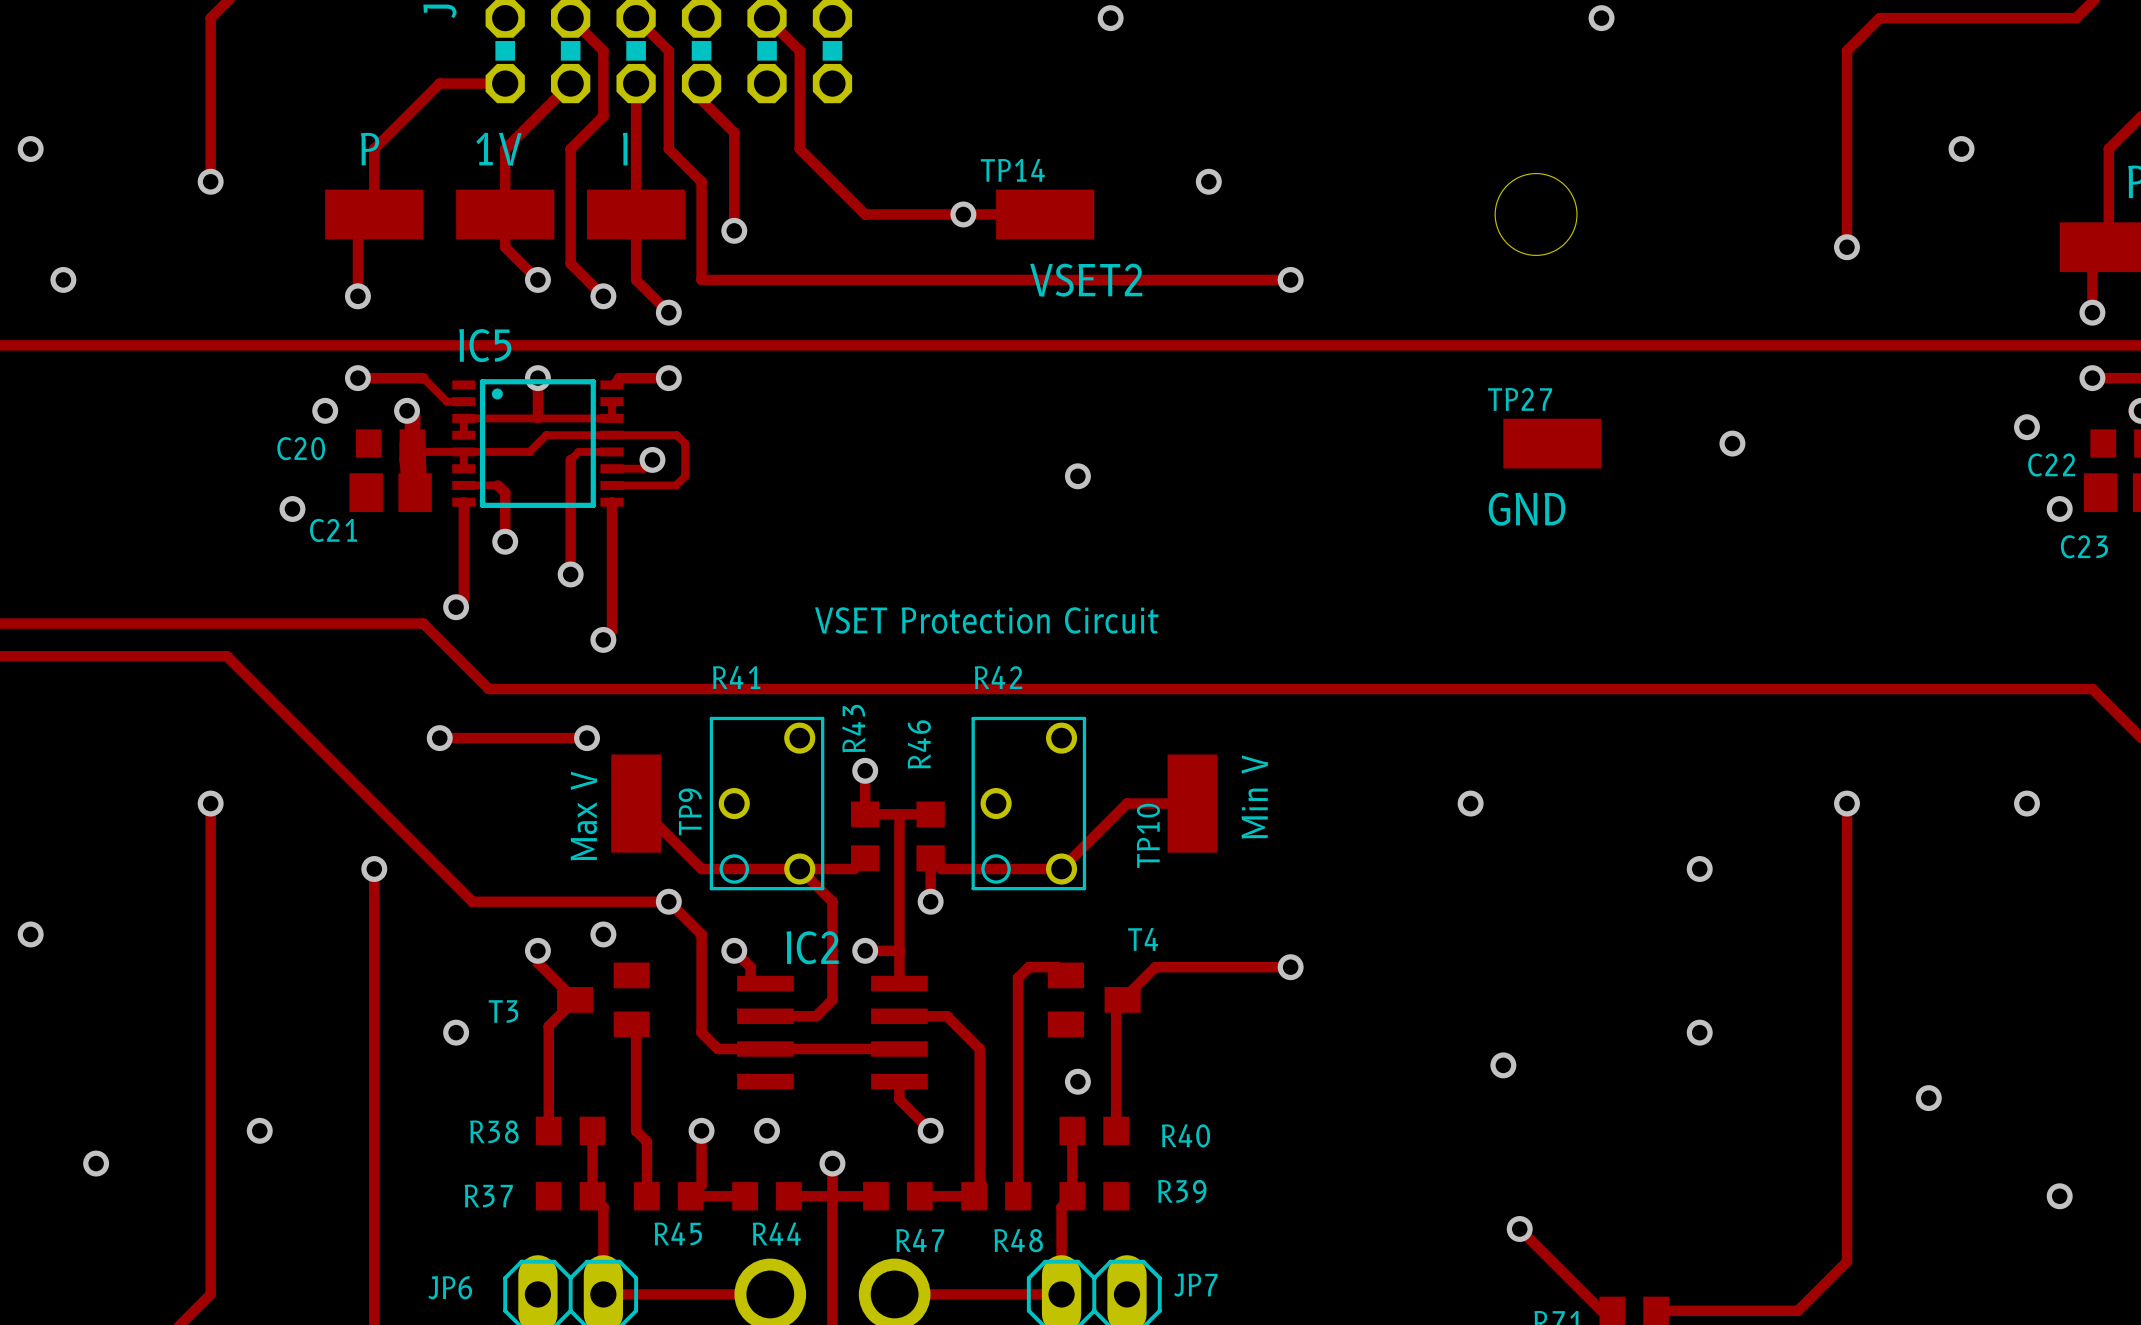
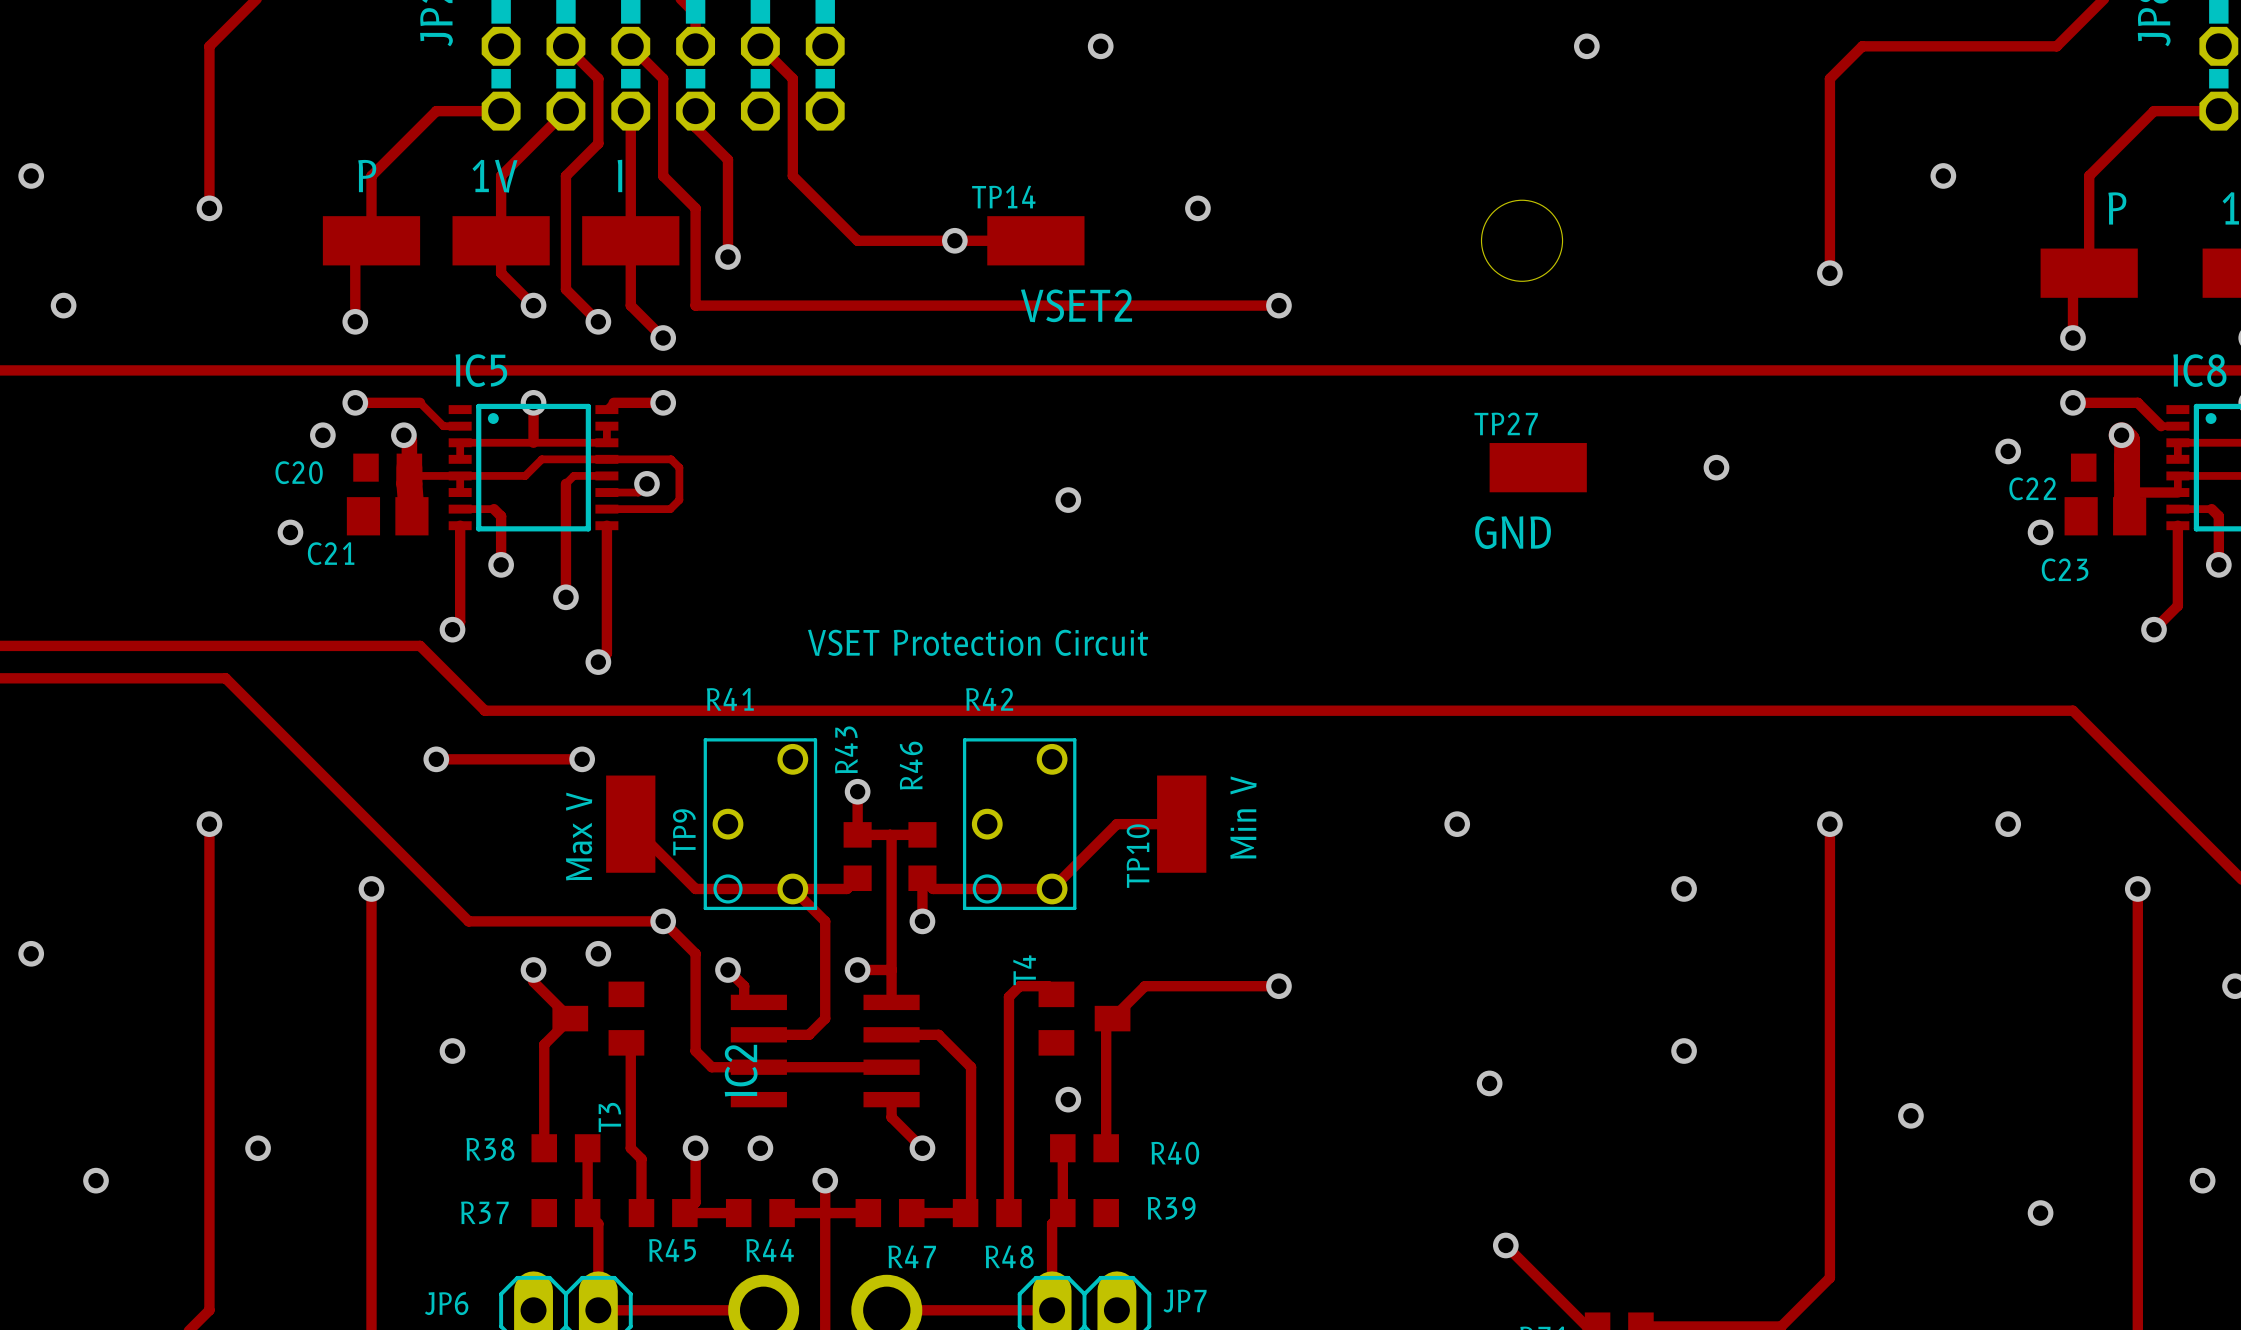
T4 name rotation: 0° (1143, 939) -> 90° counterclockwise (1024, 970)
T4 name position: T4 (1143, 939) -> T4 (1024, 970)
IC2 name rotation: 0° (812, 947) -> 90° counterclockwise (741, 1070)
IC2 name position: IC2 (812, 947) -> IC2 (741, 1070)
T3 name rotation: 0° (503, 1011) -> 90° counterclockwise (609, 1117)
T3 name position: T3 (503, 1011) -> T3 (609, 1117)

